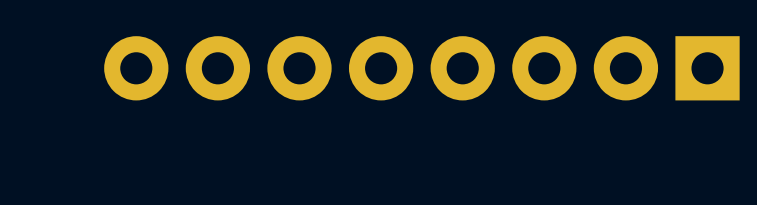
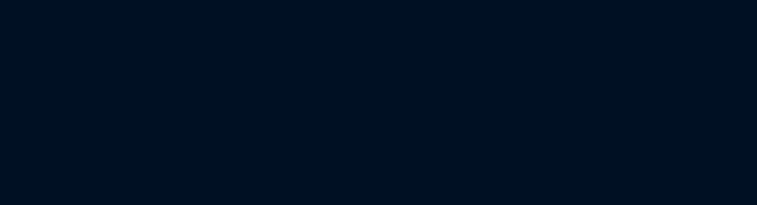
part: (421, 68) -> none

